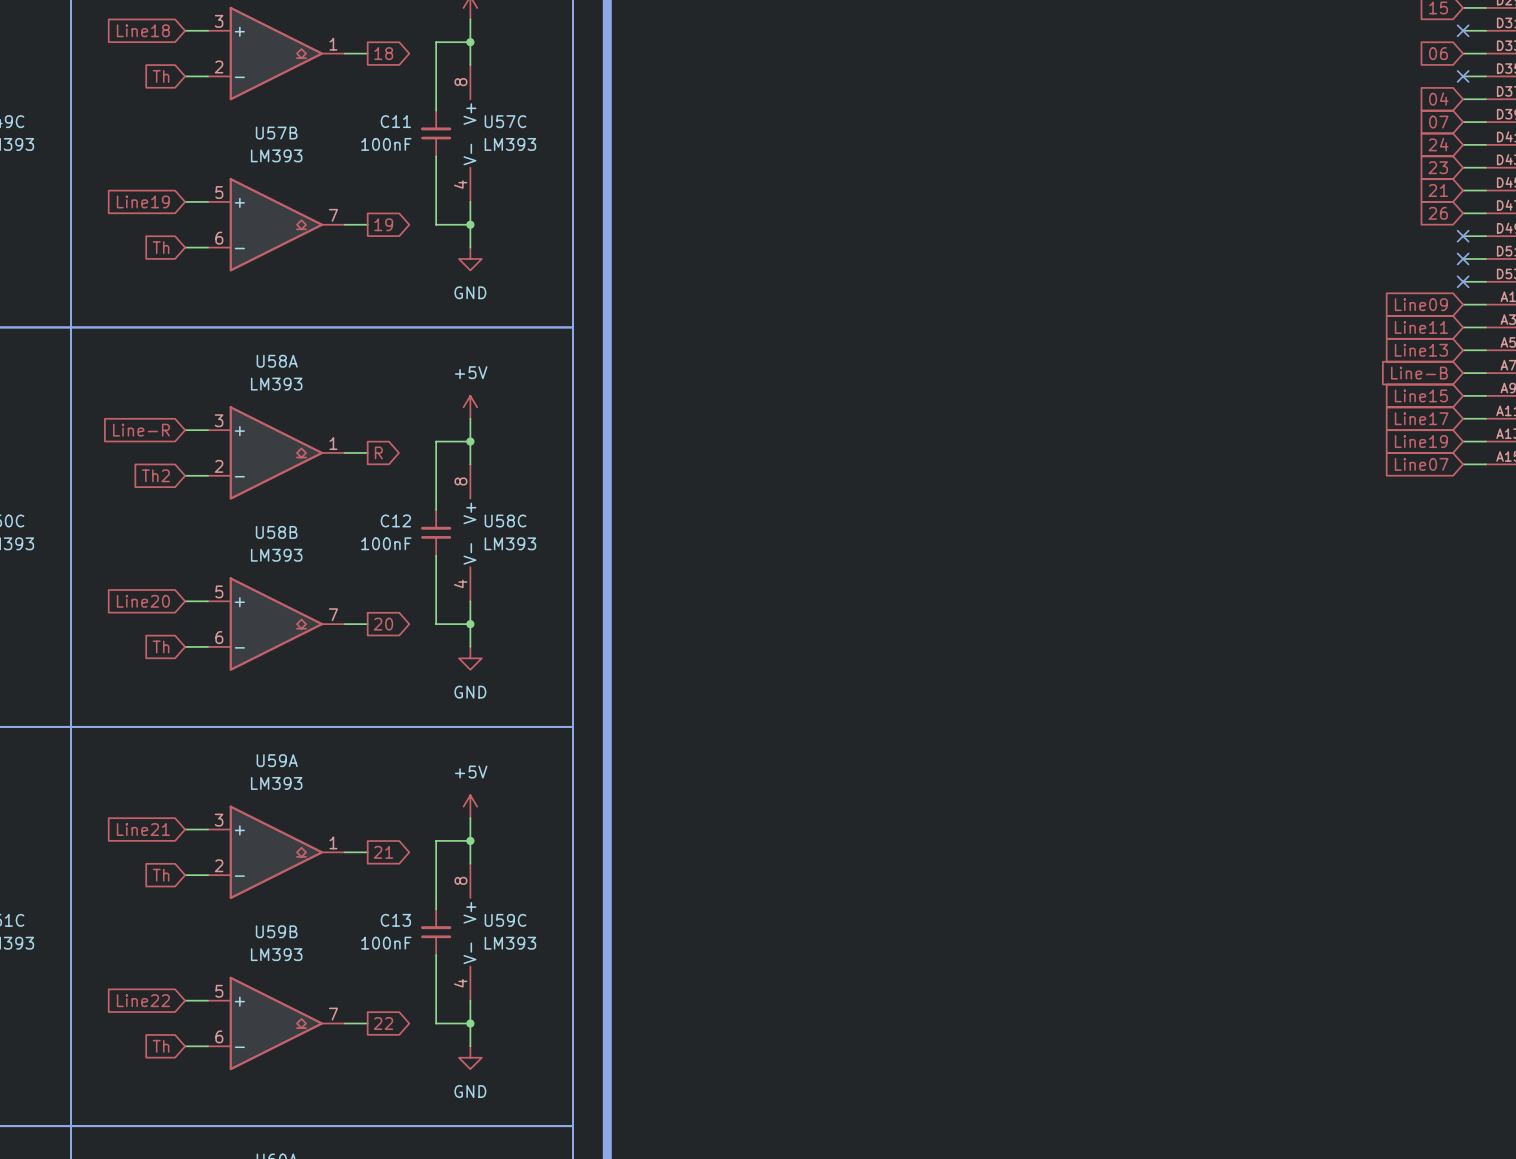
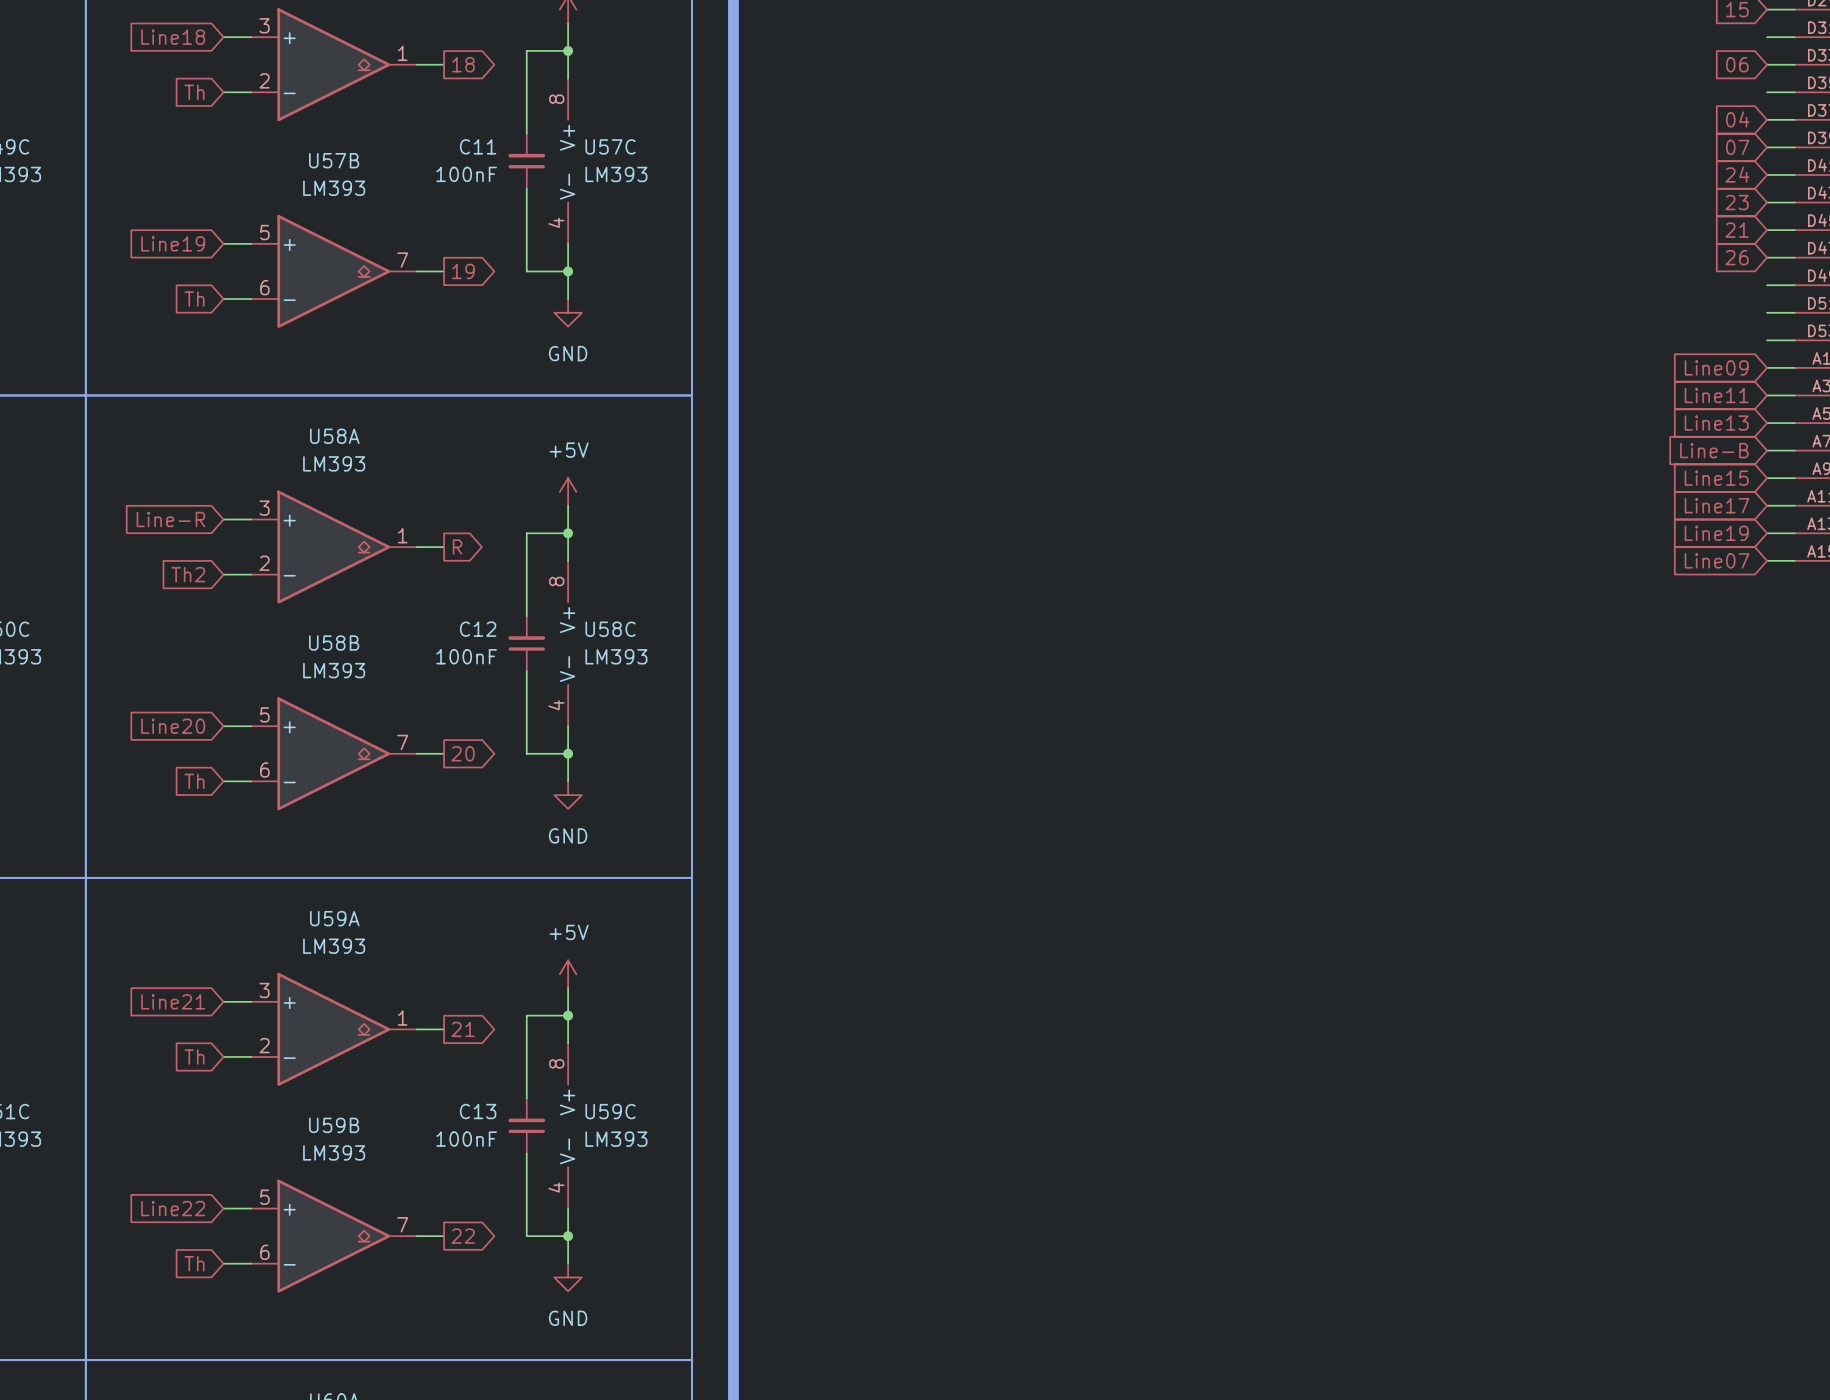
no-connect mark: (1463, 30) -> none
no-connect mark: (1463, 76) -> none
no-connect mark: (1463, 236) -> none
no-connect mark: (1463, 258) -> none
no-connect mark: (1463, 281) -> none

